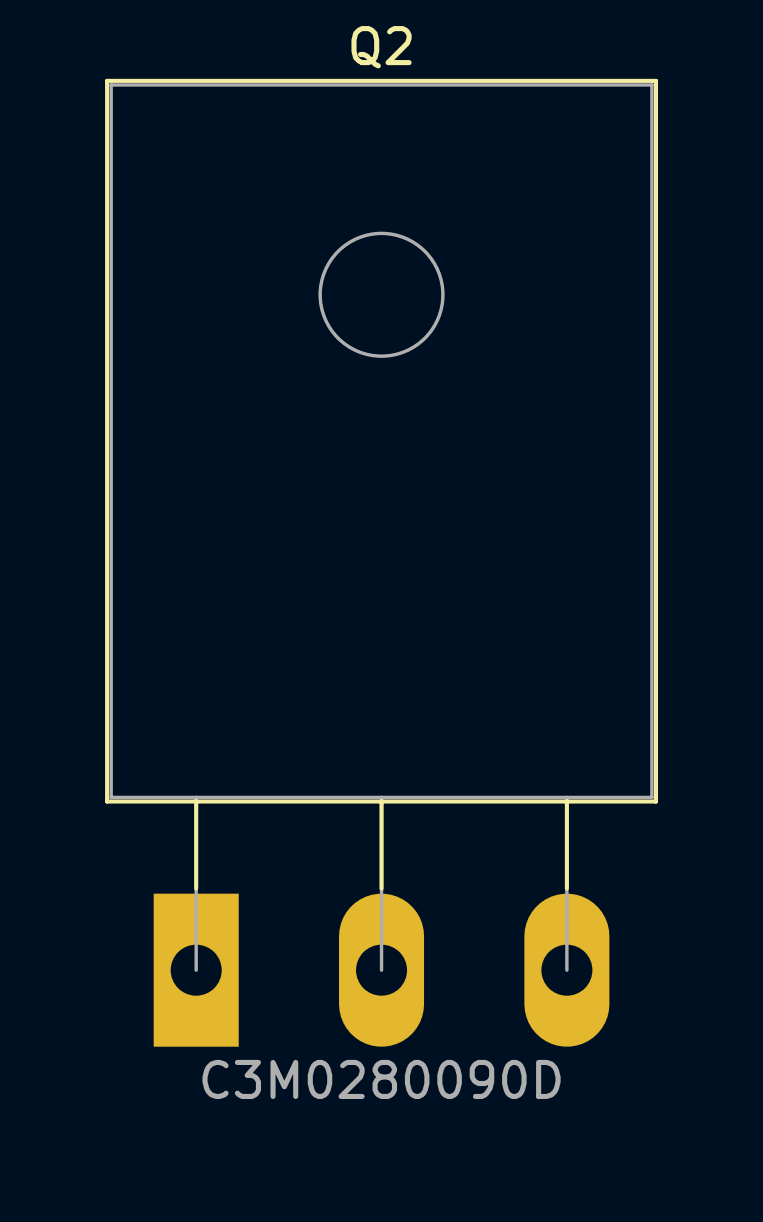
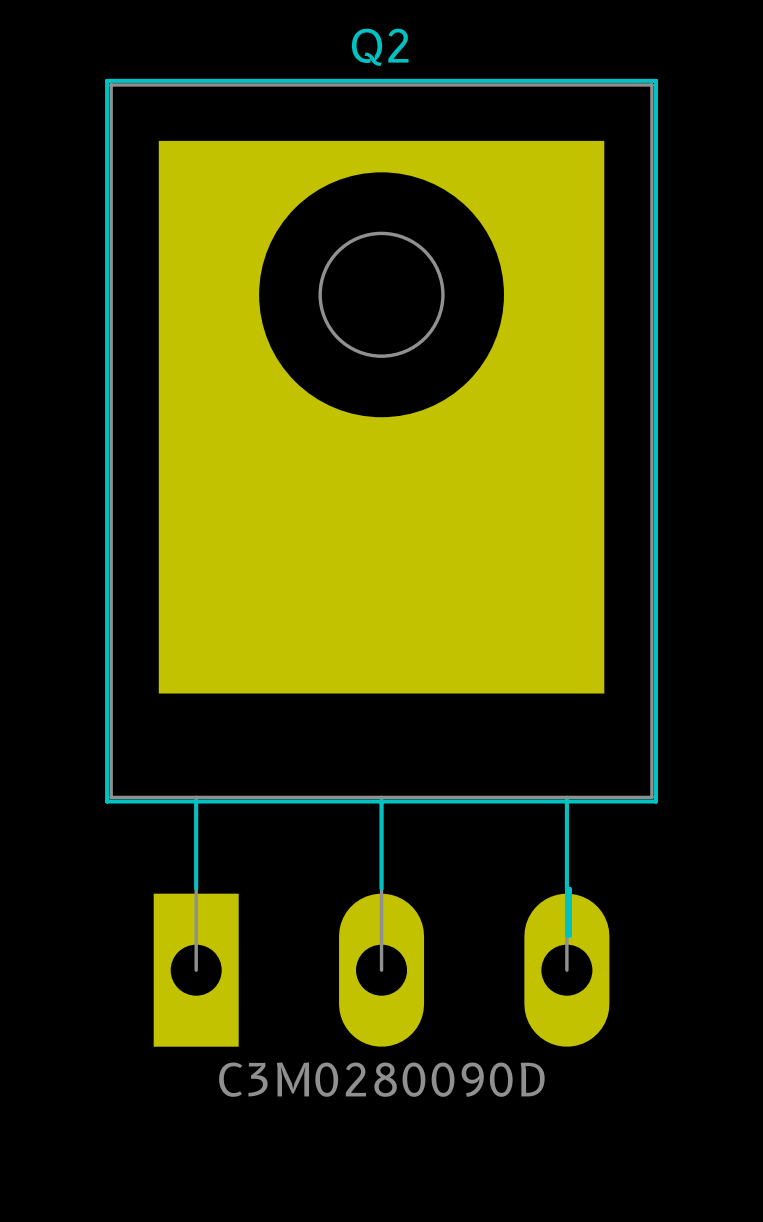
Q2 footprint: [105, 78, 659, 1047] -> [105, 78, 659, 1047]

